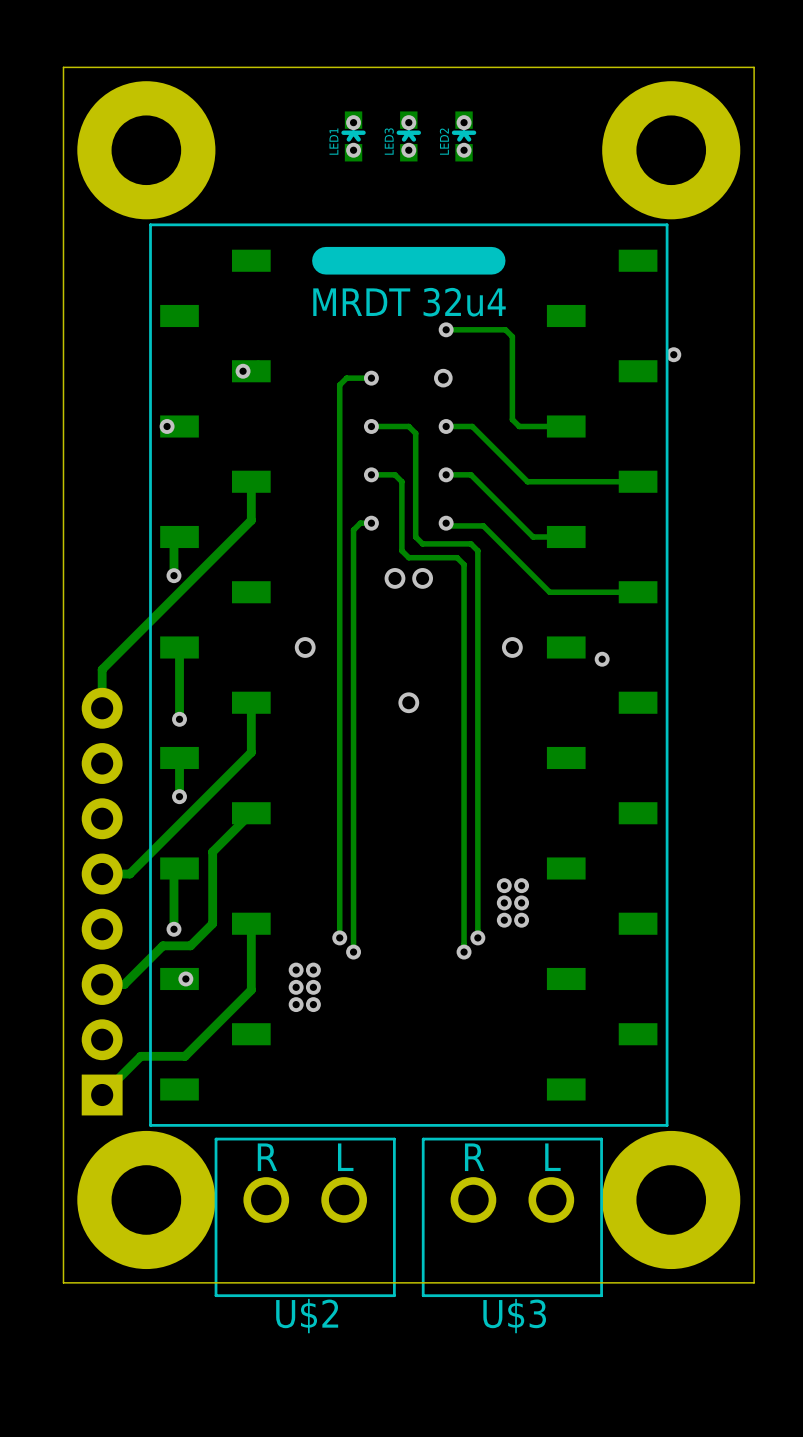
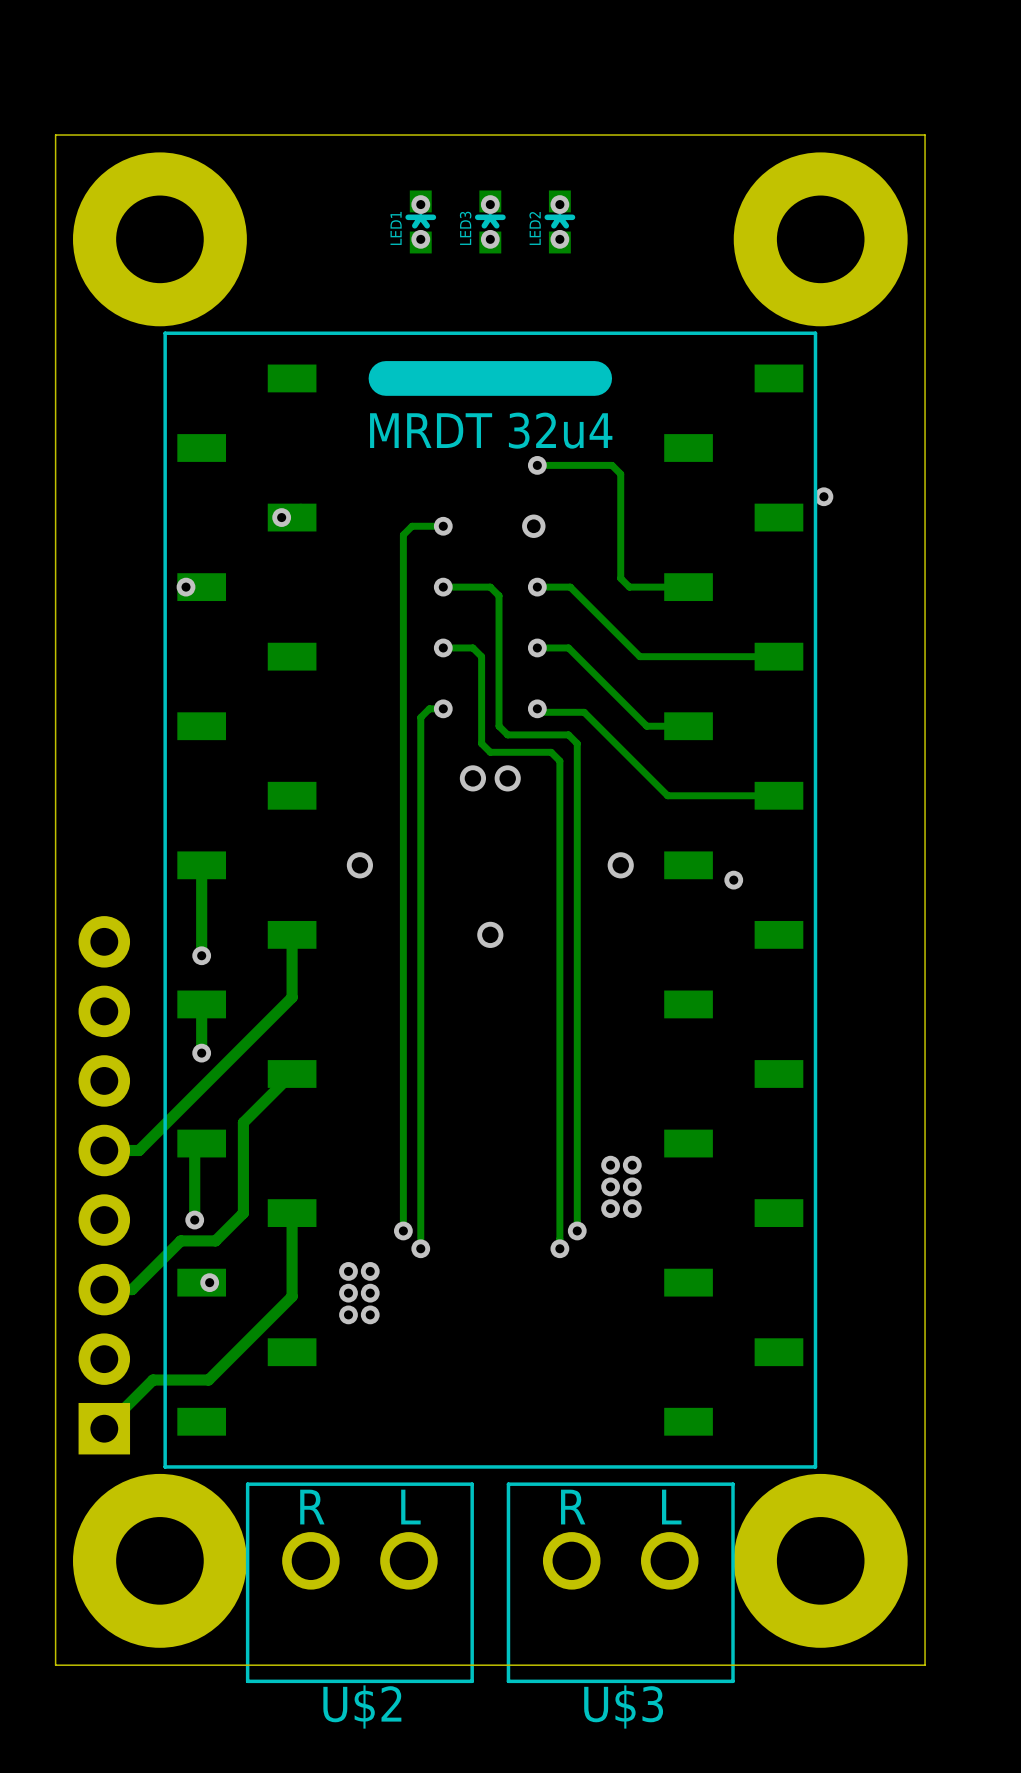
track: (251, 481) (251, 520) (102, 669) (102, 708) -> none
track: (179, 536) (173, 542) (173, 575) -> none
via: (173, 575) -> none

